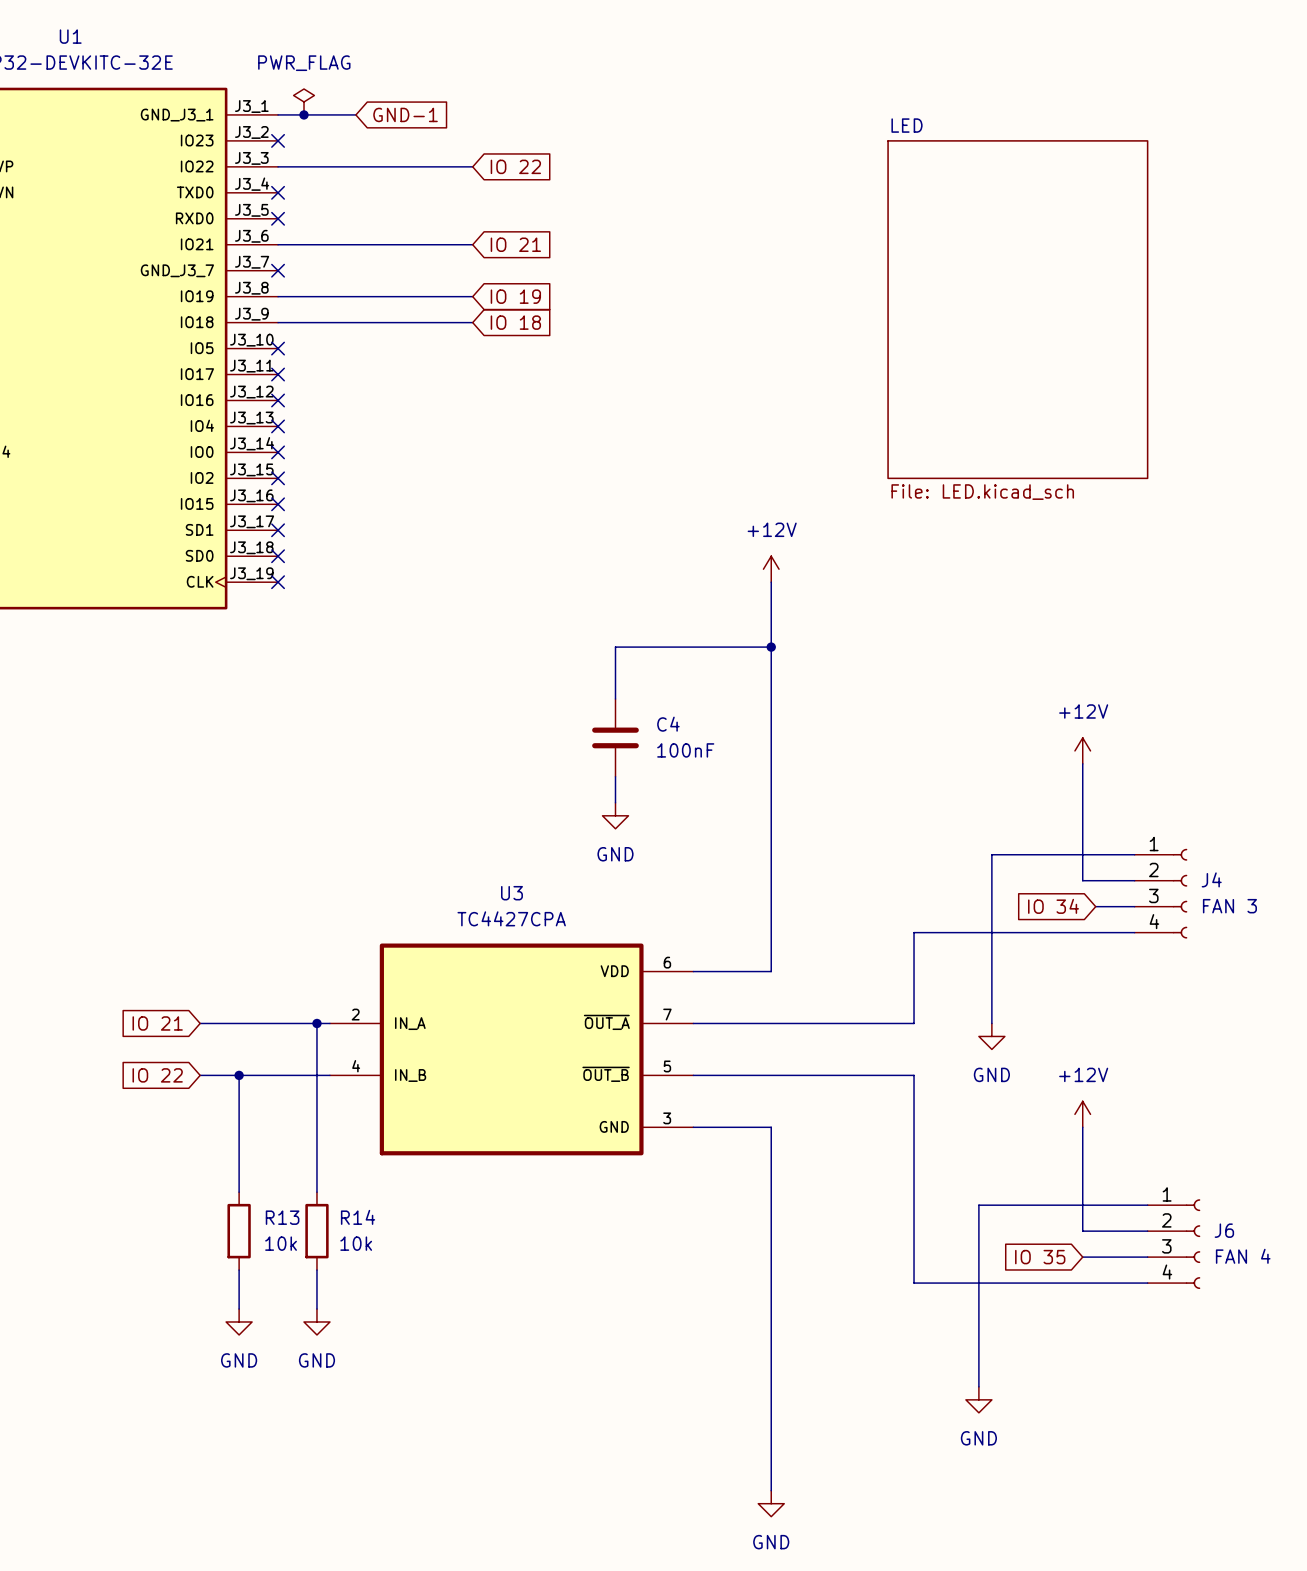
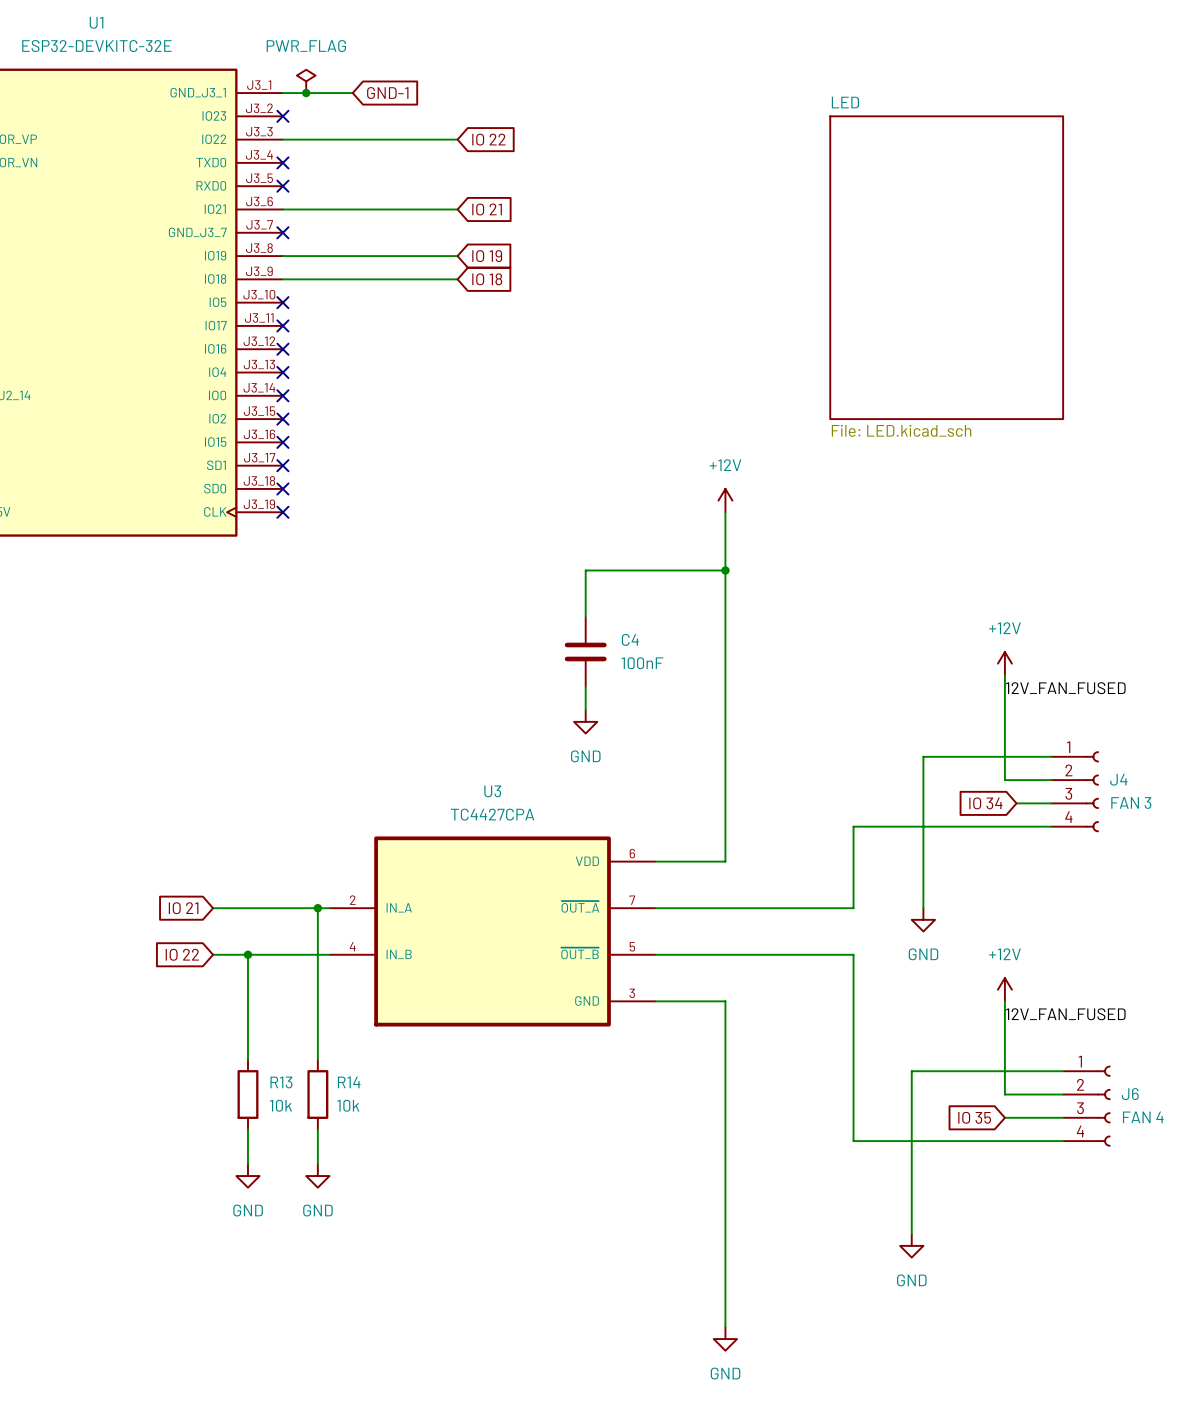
label: none -> 12V_FAN_FUSED (1065, 688)
label: none -> 12V_FAN_FUSED (1065, 1014)

